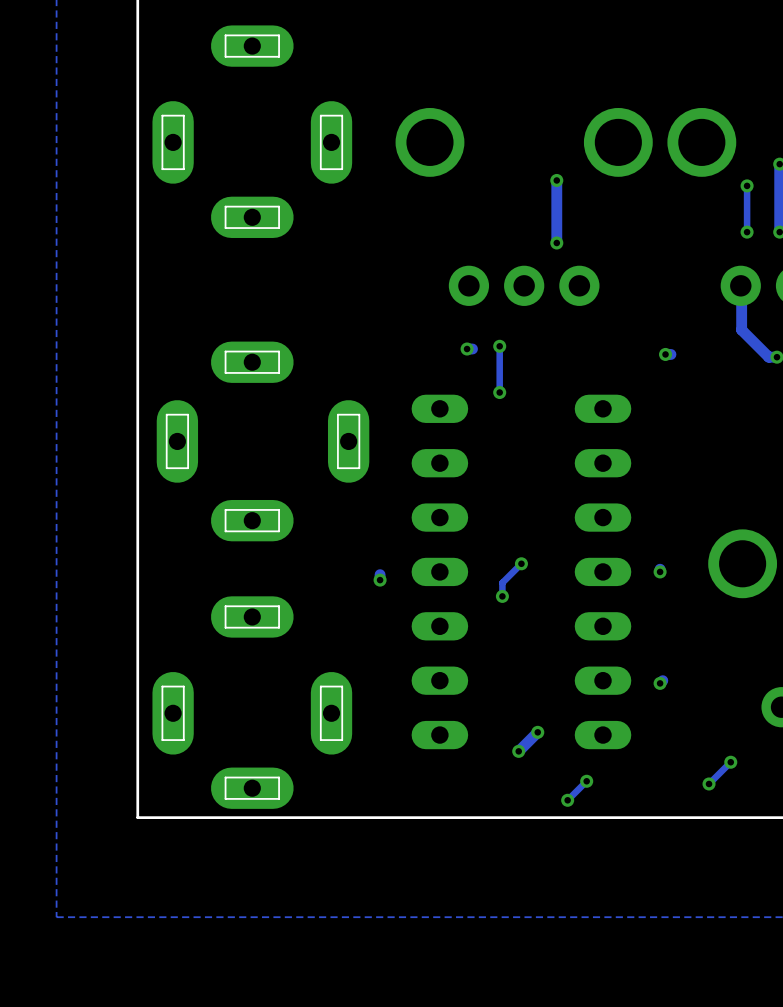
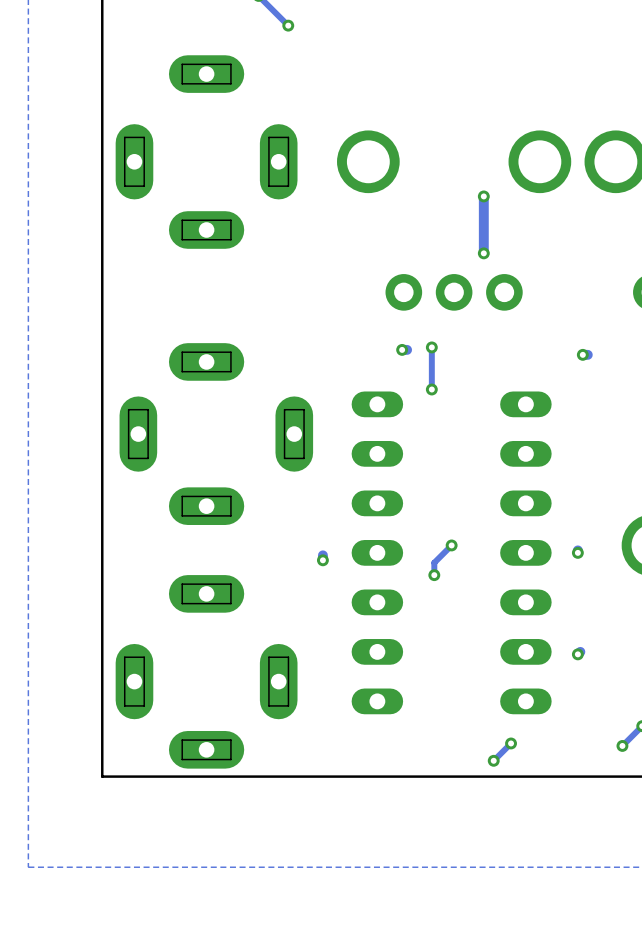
track: (537, 732) (518, 751) -> none
via: (537, 732) -> none
via: (518, 751) -> none

